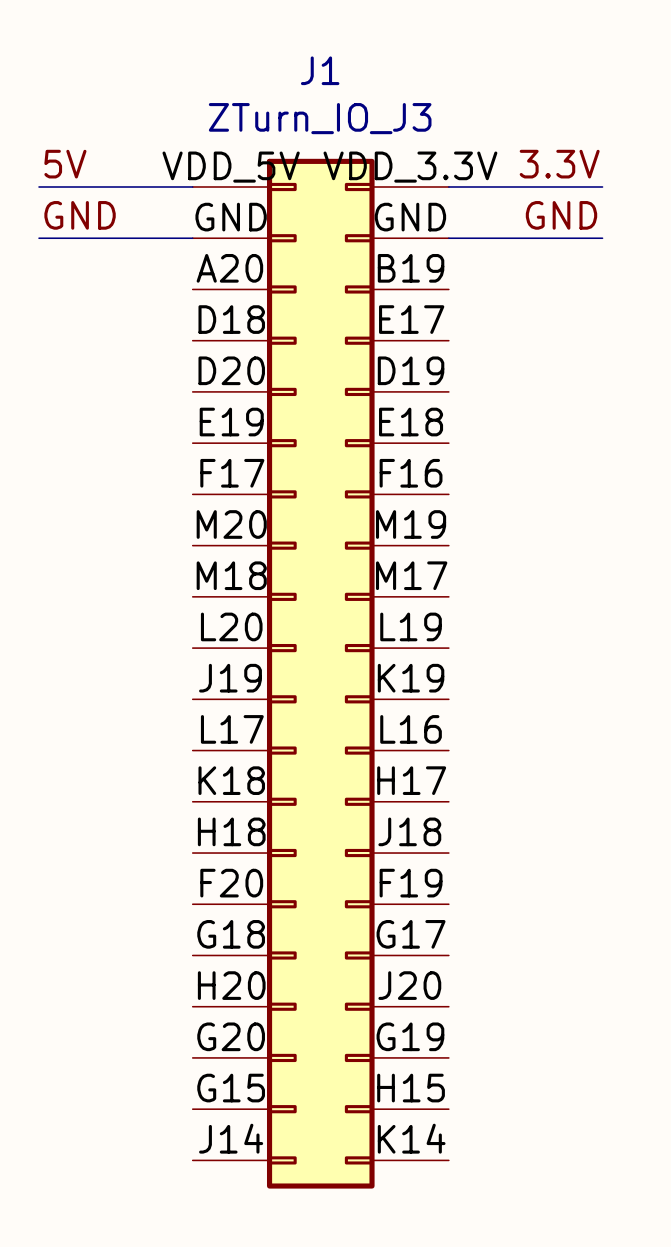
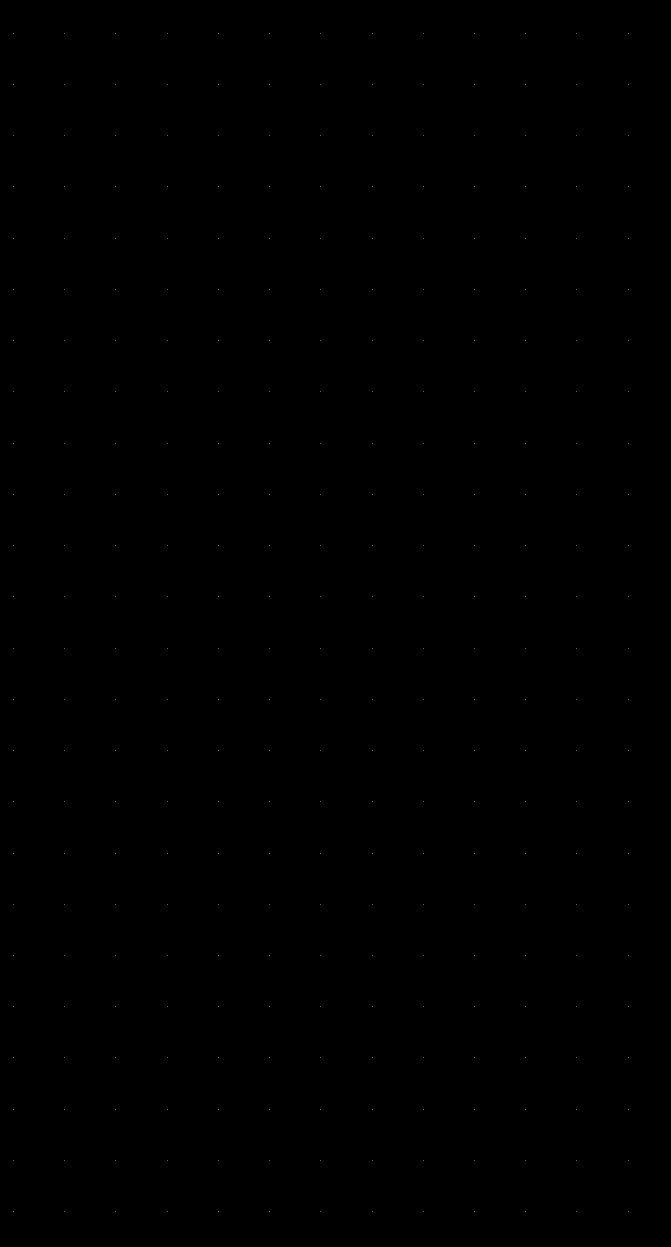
label: 5V (65, 164) -> none
label: 3.3V (559, 164) -> none
wire: (39, 186) (192, 186) -> none
wire: (448, 186) (602, 186) -> none
label: GND (80, 215) -> none
label: GND (561, 215) -> none
wire: (39, 238) (192, 238) -> none
wire: (448, 238) (602, 238) -> none
J1: ZTurn_IO_J3 (320, 673) -> none

